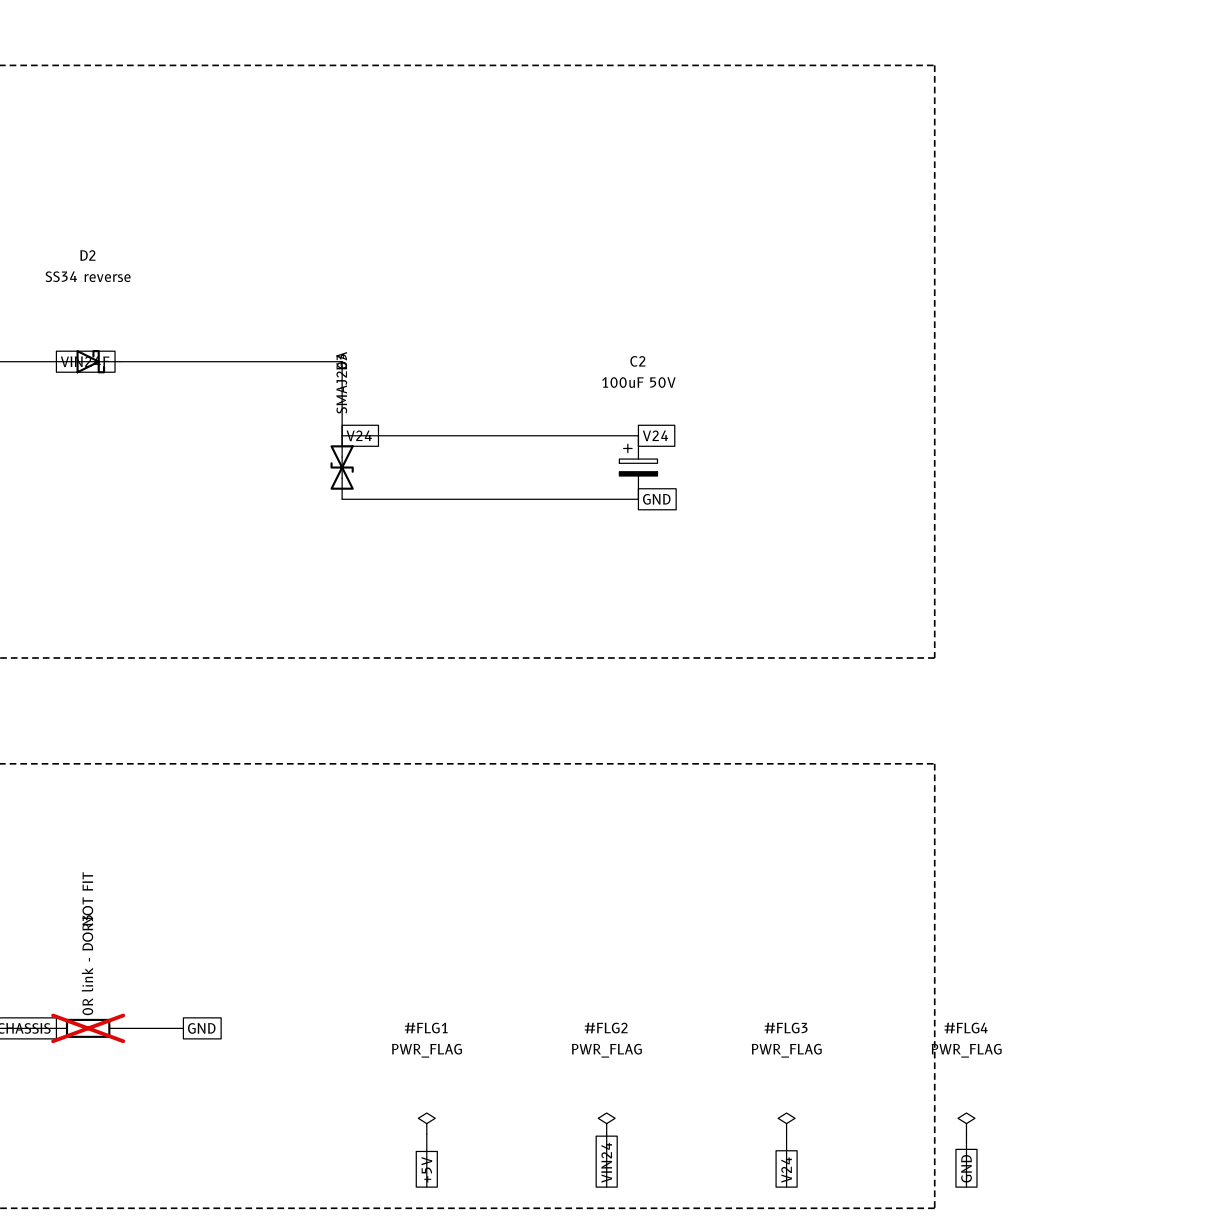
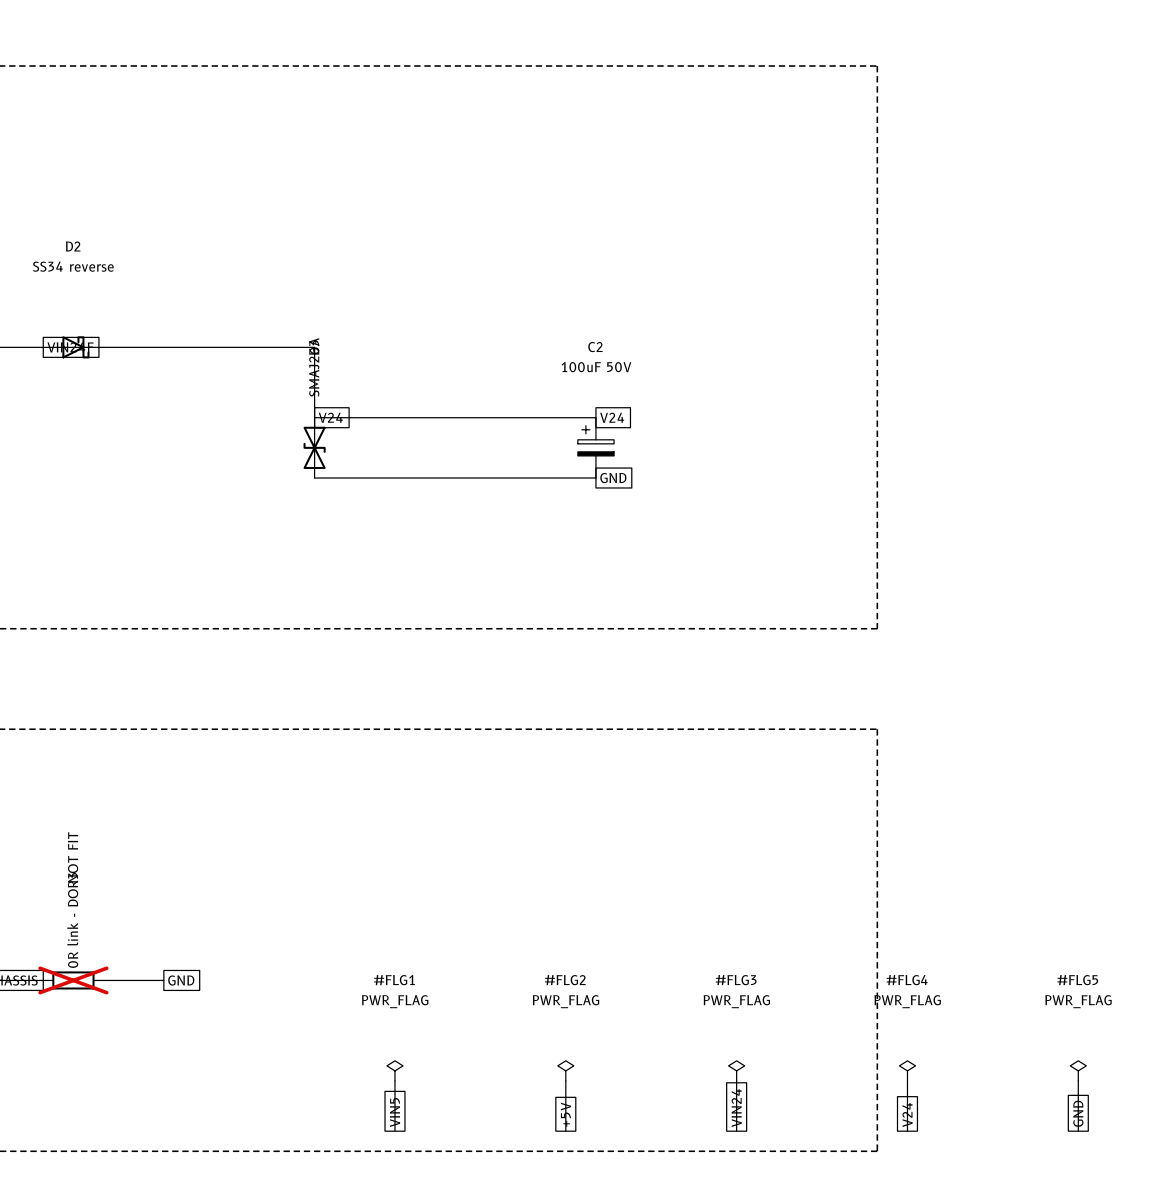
#FLG5: none -> PWR_FLAG (1078, 1070)
wire: none -> (1078, 1080) (1078, 1131)
global label: VIN24 (606, 1162) -> +5V (565, 1114)
global label: GND (966, 1168) -> V24 (907, 1114)
global label: none -> GND (1078, 1113)
global label: +5V (426, 1169) -> VIN5 (395, 1112)
global label: V24 (786, 1170) -> VIN24 (736, 1108)

